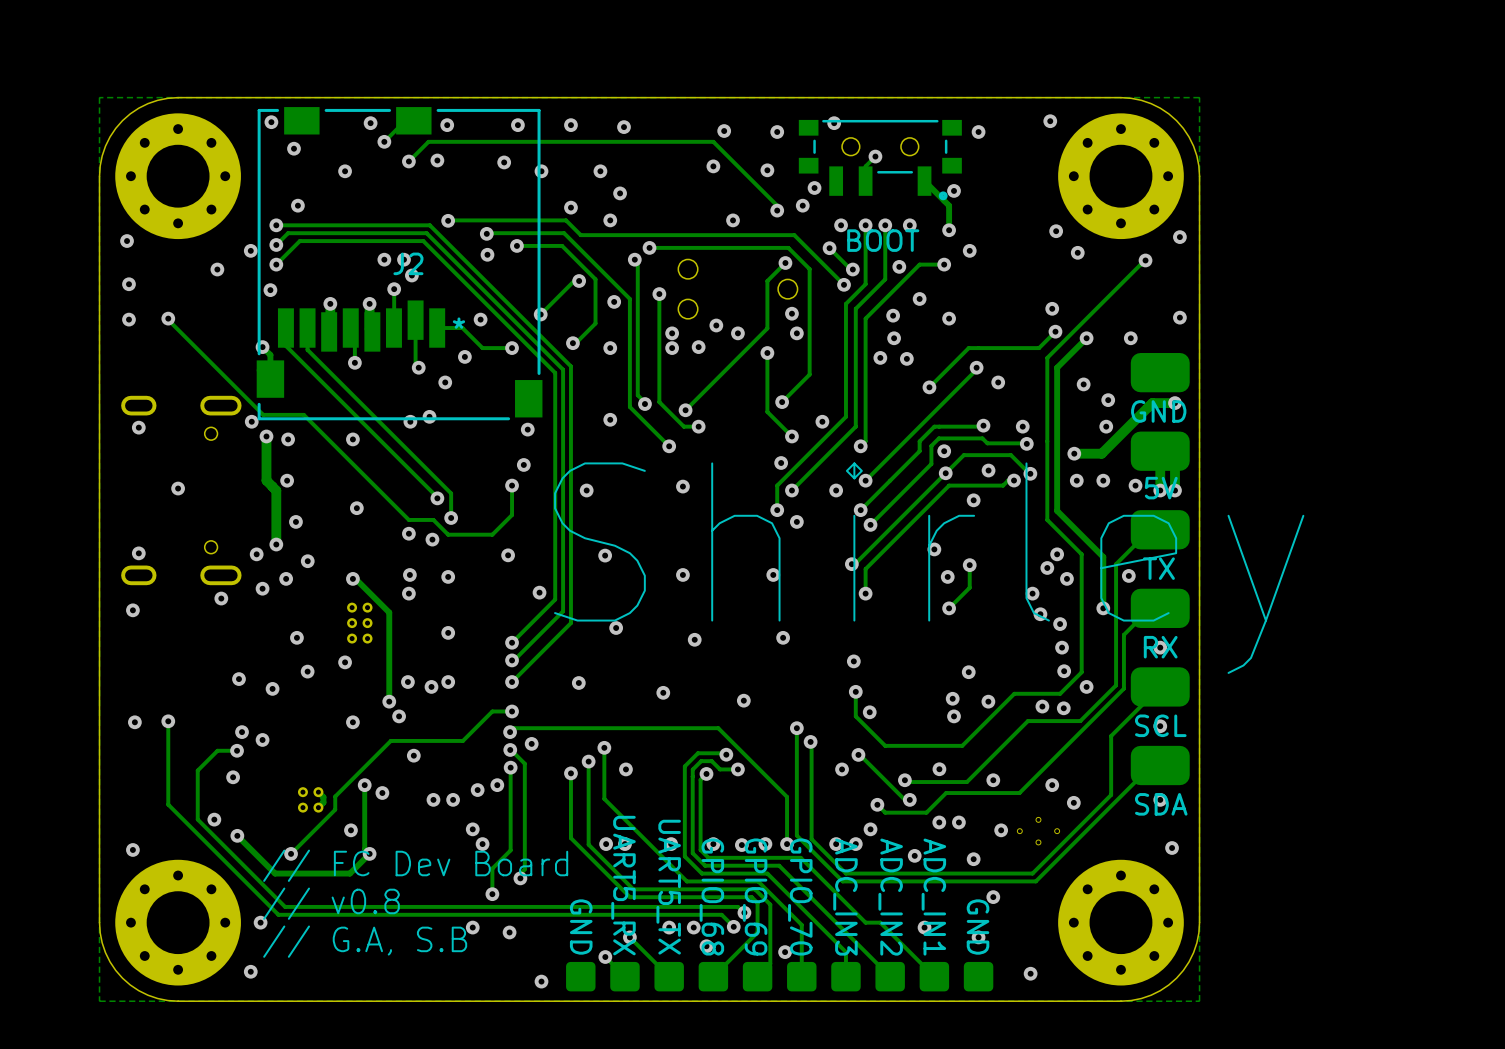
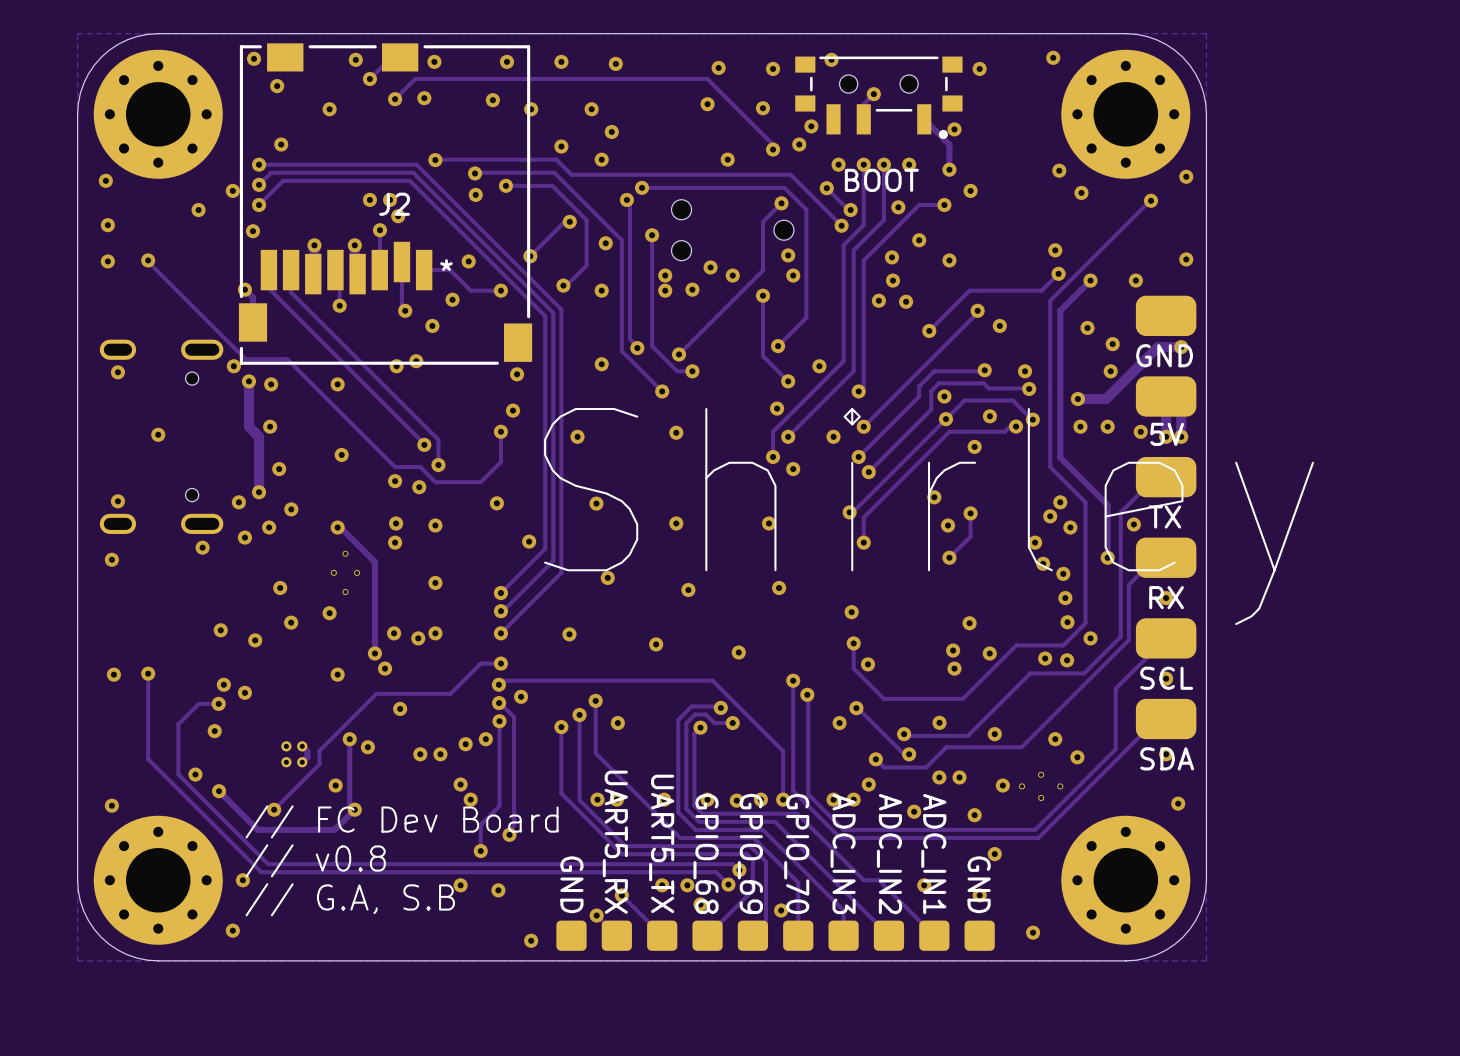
part footprint: [347, 602, 373, 644] -> [330, 550, 361, 596]

